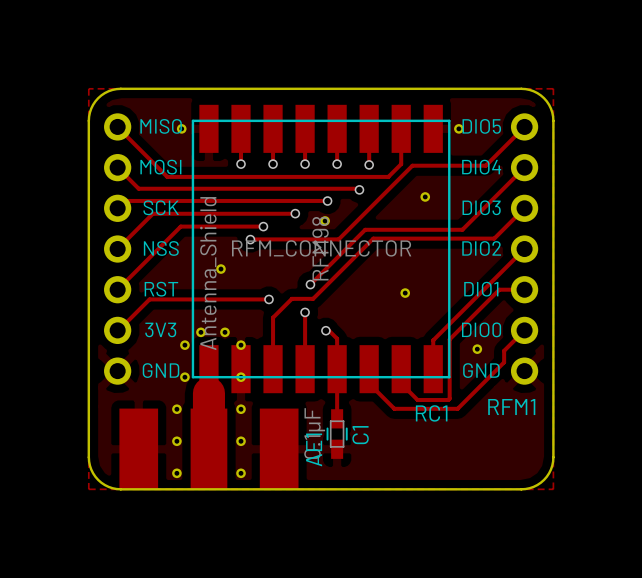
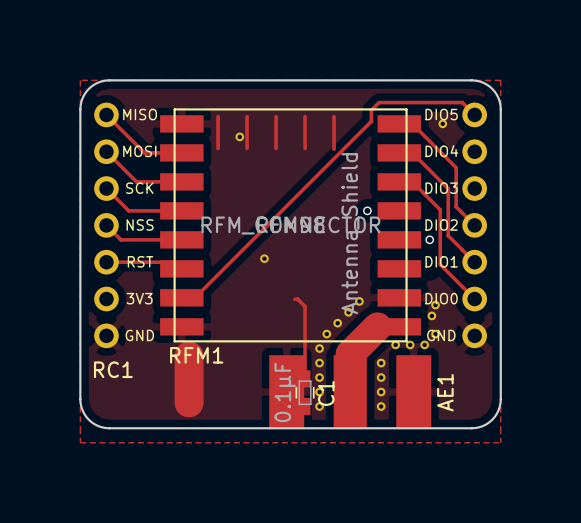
RC1 footprint: [104, 113, 539, 385] -> [94, 102, 488, 349]
track: (117, 126) (167, 176) (388, 176) (401, 164) (401, 128) -> (106, 114) (144, 152) (181, 152)
track: (524, 126) (485, 165) (412, 165) (338, 239) (250, 239) -> (474, 114) (462, 102) (379, 102) (371, 110) (371, 121) (194, 297) (181, 297)
part: (181, 128) -> none
part position: (458, 128) -> (442, 123)
part: none -> (239, 136)
via: (241, 164) -> none
via: (273, 164) -> none
via: (305, 164) -> none
via: (337, 164) -> none
via: (369, 164) -> none
track: (524, 167) (462, 229) (365, 229) (310, 284) -> none
track: (138, 188) (359, 189) -> none
via: (359, 189) -> none
part: (425, 196) -> none
via: (327, 201) -> none
track: none -> (106, 188) (128, 210) (181, 210)
track: (524, 208) (494, 238) (373, 238) (313, 298) (291, 298) (273, 317) (273, 369) -> none
track: (295, 213) (152, 213) (117, 249) -> (181, 239) (120, 239) (106, 225)
via: (295, 213) -> none
part: (325, 220) -> none
track: (263, 226) (180, 226) (117, 289) -> (181, 268) (175, 262) (106, 262)
via: (263, 226) -> none
via: none -> (367, 210)
via: (250, 239) -> none
RFM1 rotation: 0° (321, 249) -> 90° clockwise (290, 225)
track: (524, 249) (433, 340) (433, 369) -> (474, 225) (456, 206) (456, 167) (412, 123) (399, 123)
via: none -> (429, 239)
part: (220, 269) -> none
via: (310, 284) -> none
part: none -> (264, 258)
track: (524, 289) (499, 289) (449, 339) (448, 400) (417, 400) (401, 383) (401, 369) -> (474, 262) (448, 235) (448, 188) (412, 152) (399, 152)
part: (405, 293) -> none
track: (268, 299) (149, 299) (117, 330) -> none
via: (268, 299) -> none
track: (305, 312) (305, 369) -> none
via: (305, 312) -> none
via: (325, 330) -> none
track: (524, 330) (504, 350) (504, 362) (457, 408) (394, 408) (369, 383) (369, 369) -> (474, 299) (440, 264) (440, 209) (412, 181) (399, 181)
part: (200, 332) -> none
part: (224, 332) -> none
part: none -> (359, 301)
part: none -> (435, 305)
part: (184, 345) -> none
part: (241, 345) -> none
part: none -> (348, 312)
part: none -> (337, 323)
track: none -> (377, 326) (350, 354) (350, 392)
part: none -> (326, 334)
part: none -> (435, 334)
part: (184, 377) -> none
part: (241, 377) -> none
part: none -> (395, 344)
part: none -> (410, 344)
part: none -> (424, 344)
part: none -> (319, 348)
part: none -> (319, 363)
part: none -> (381, 363)
RFM1 name position: RFM1 (511, 407) -> RFM1 (196, 355)
part: (176, 409) -> none
part: (241, 409) -> none
RC1 name position: RC1 (431, 413) -> RC1 (113, 369)
part: none -> (319, 377)
part: none -> (381, 377)
part: none -> (319, 392)
part: none -> (381, 392)
board edge: (88, 441) (89, 461) (93, 473) (104, 485) (120, 489) (525, 489) (537, 485) (549, 473) (553, 461) (553, 441) -> (80, 399) (82, 410) (88, 419) (98, 426) (109, 428) (475, 428) (492, 419) (498, 410) (500, 399)
part: (176, 441) -> none
part: (241, 441) -> none
AE1 position: (208, 449) -> (350, 392)
part: none -> (319, 406)
part: none -> (381, 406)
part: (176, 473) -> none
part: (241, 473) -> none

